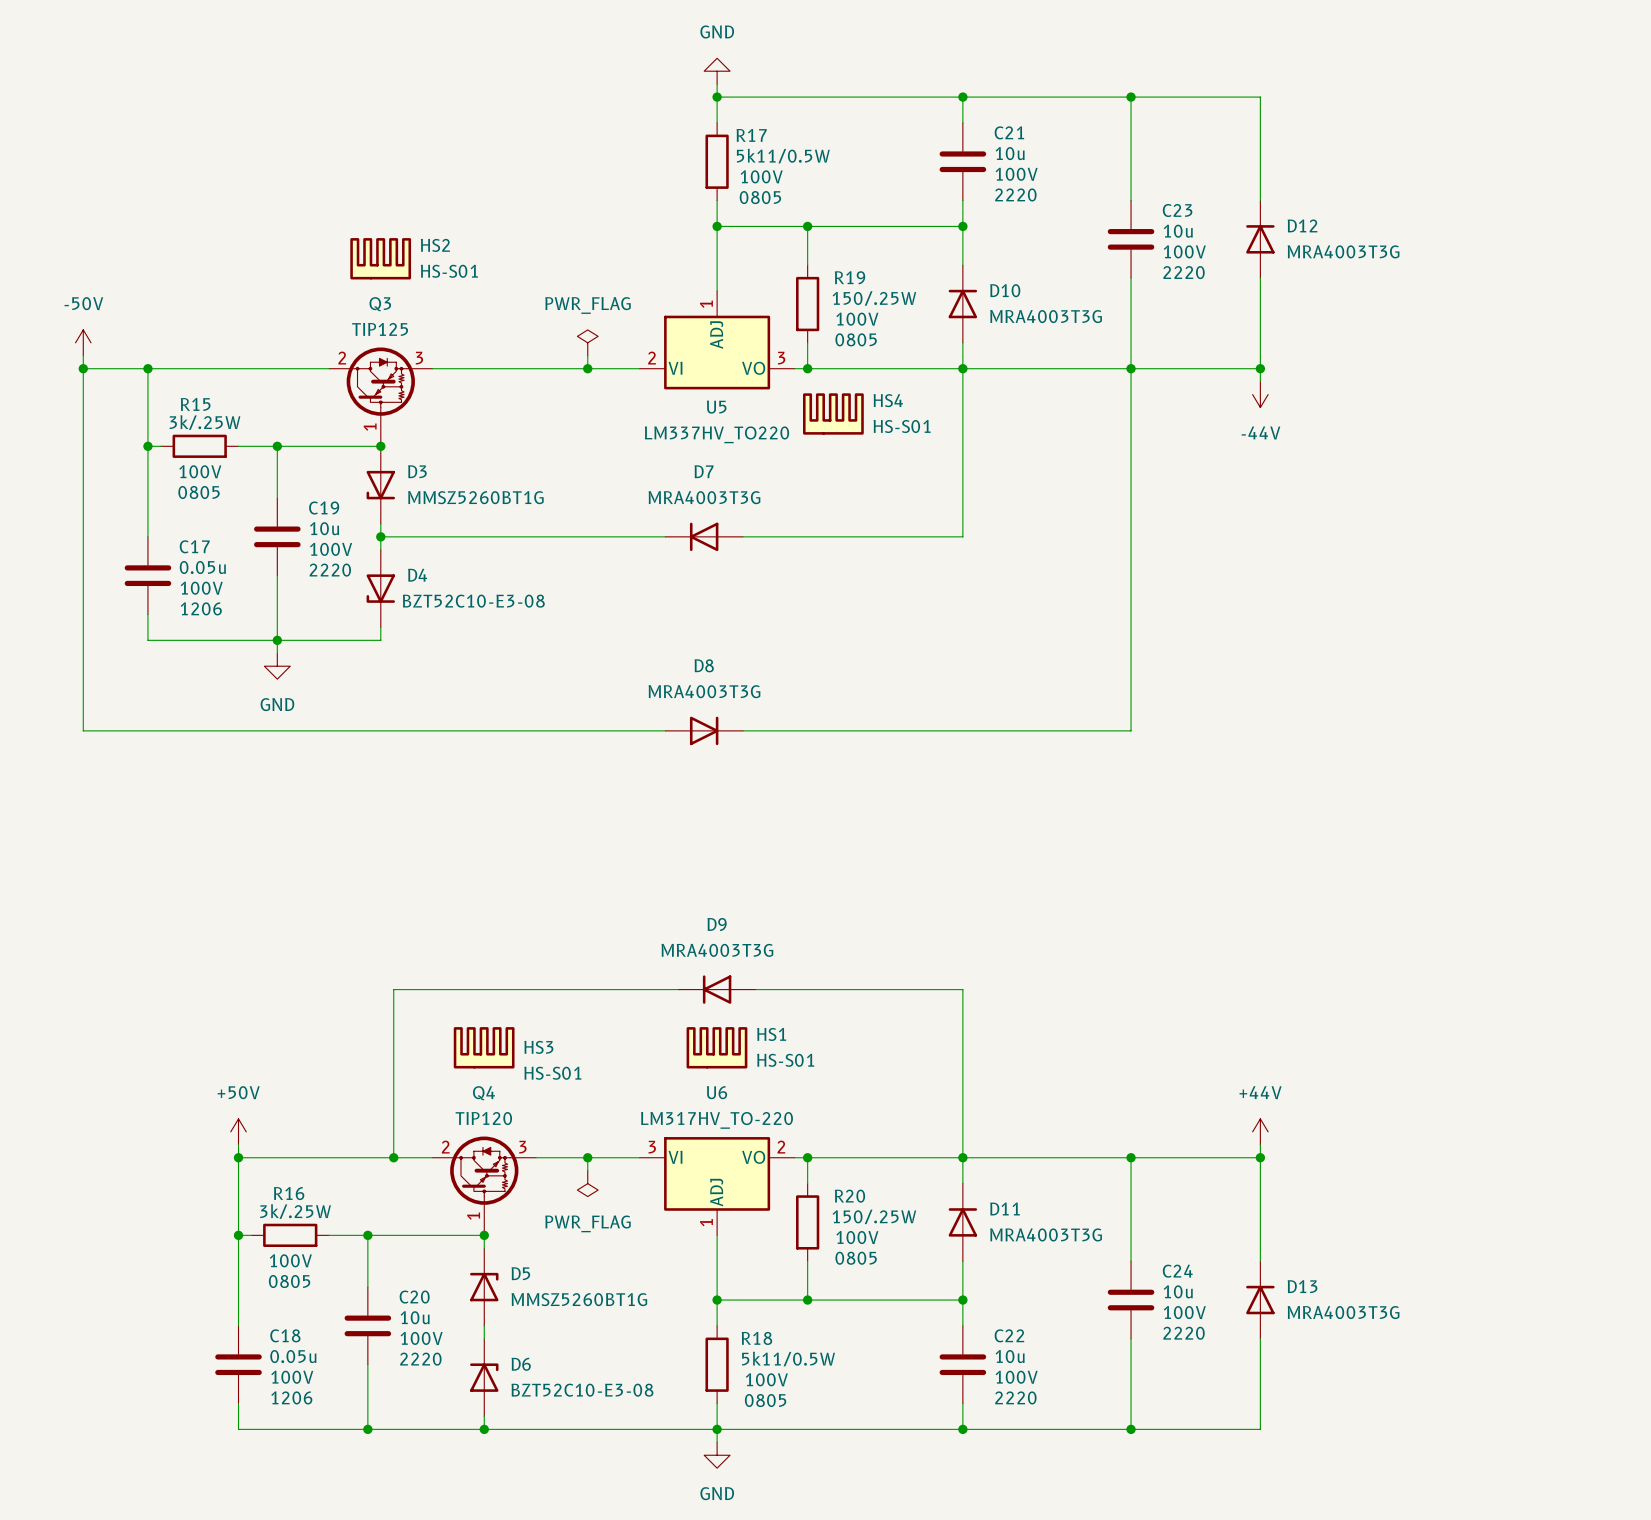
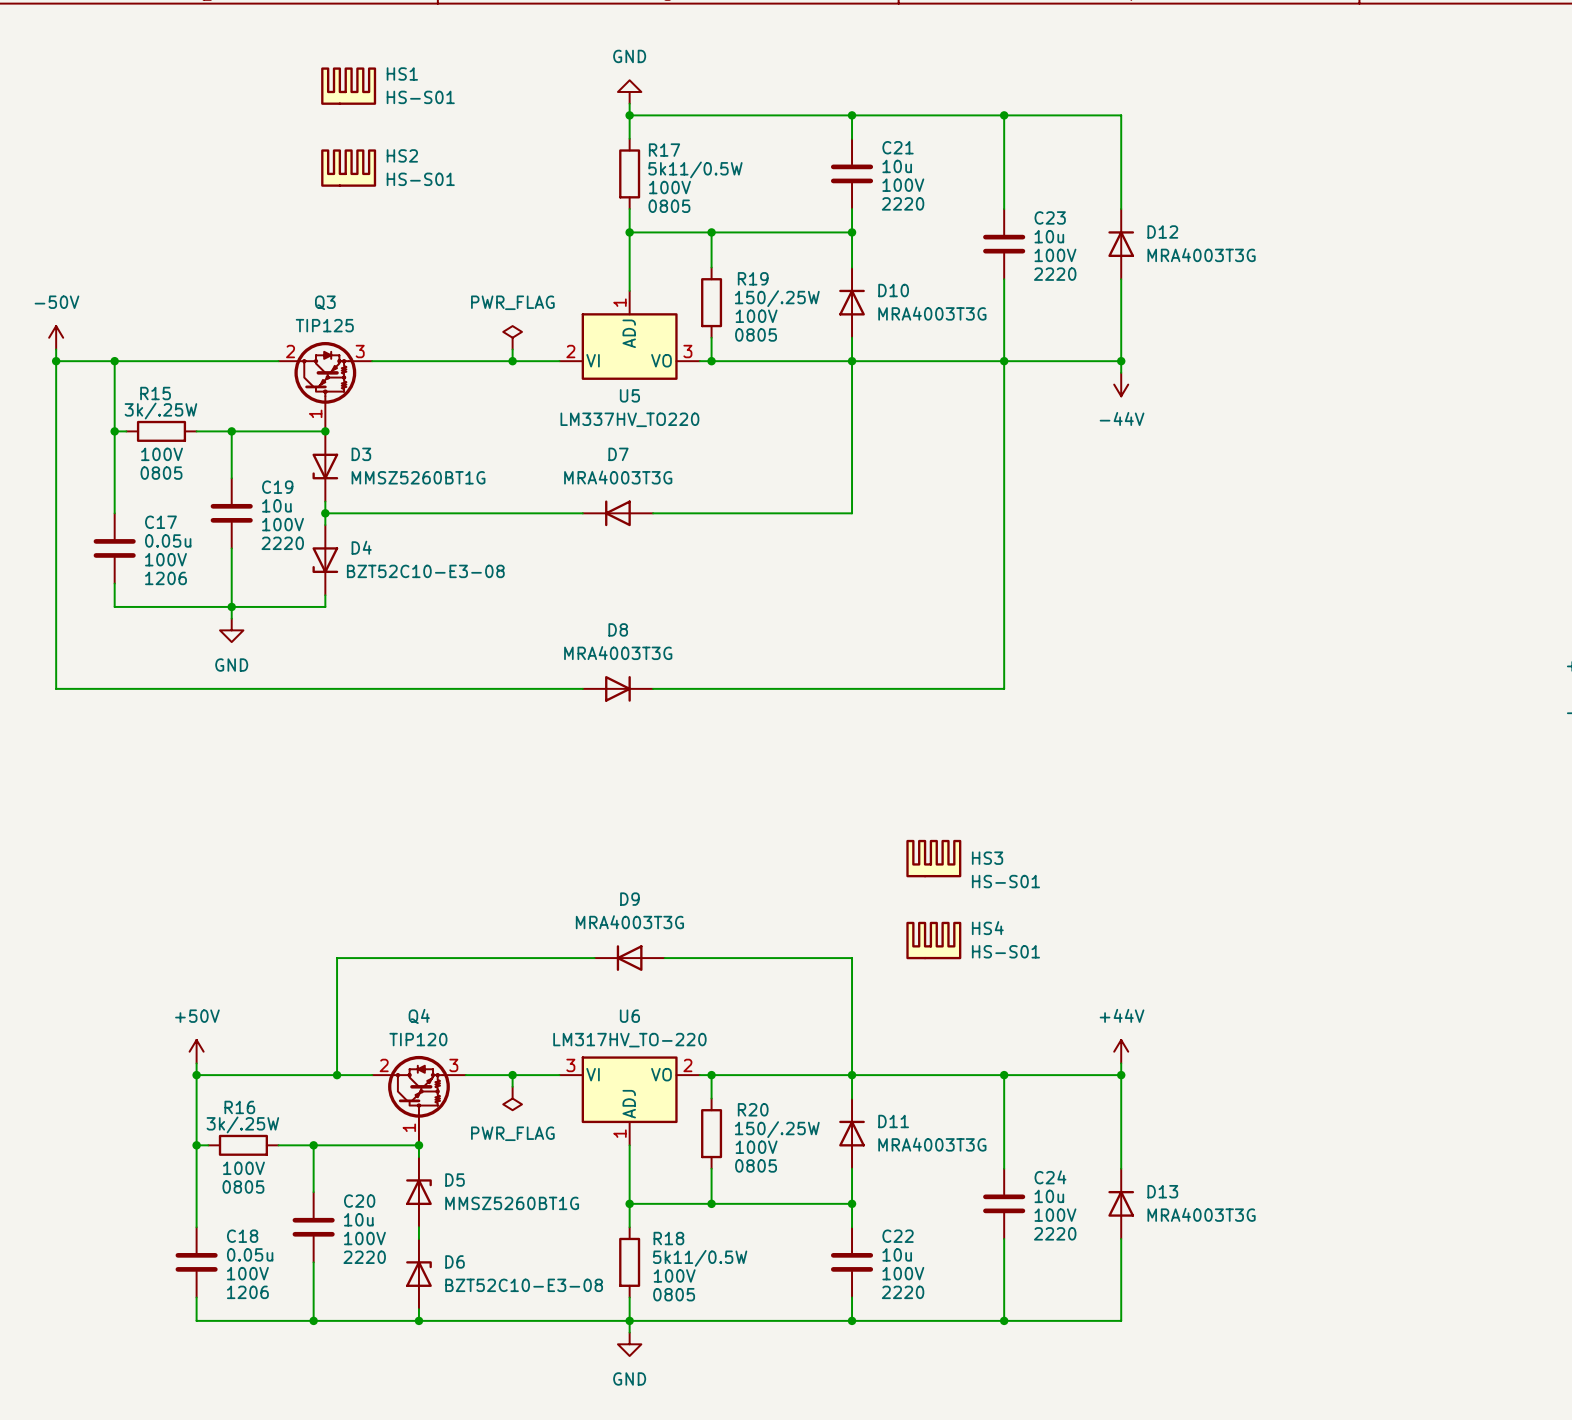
HS2 position: (380, 258) -> (348, 168)
HS4 position: (833, 413) -> (933, 940)
wire: (678, 989) (393, 989) (393, 1028) -> (594, 958) (337, 958)
D9 position: (717, 989) -> (629, 958)
wire: (755, 989) (962, 989) (962, 1028) -> (664, 958) (852, 958)
HS3 position: (484, 1047) -> (933, 858)
HS1 position: (716, 1047) -> (348, 86)

